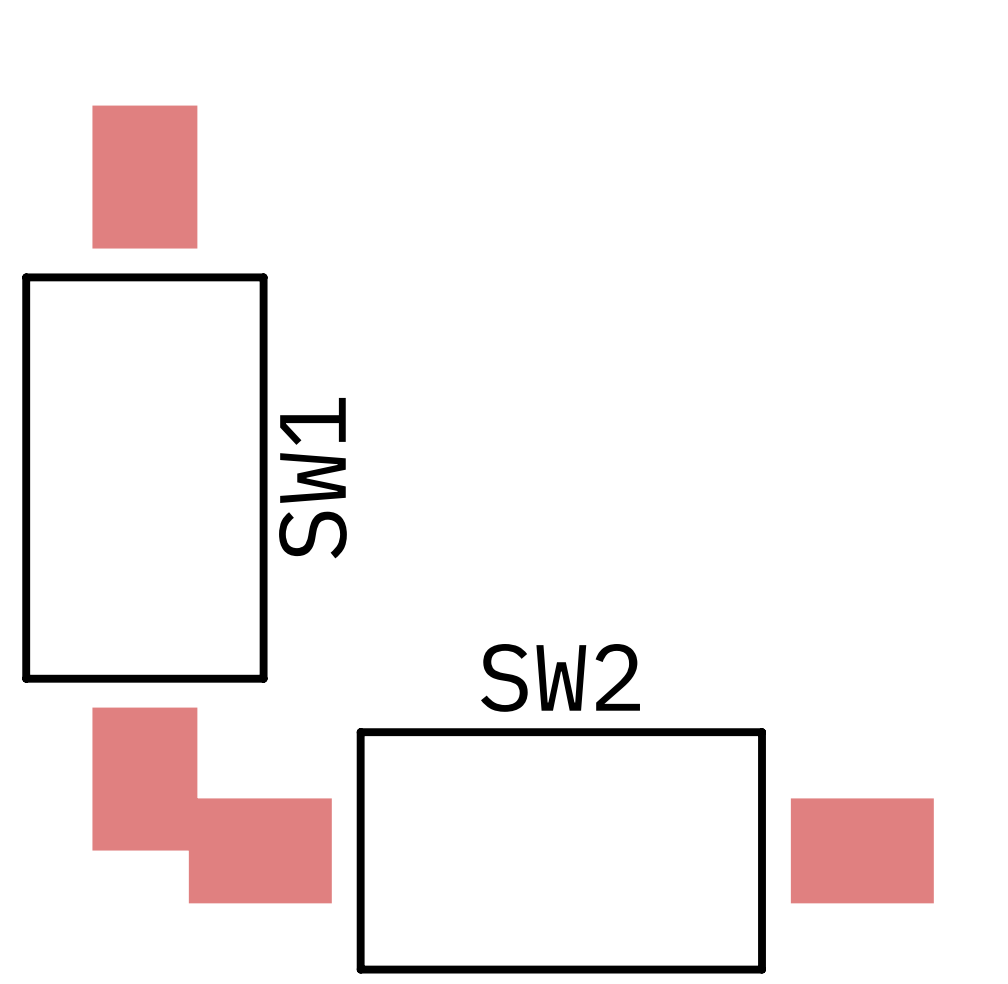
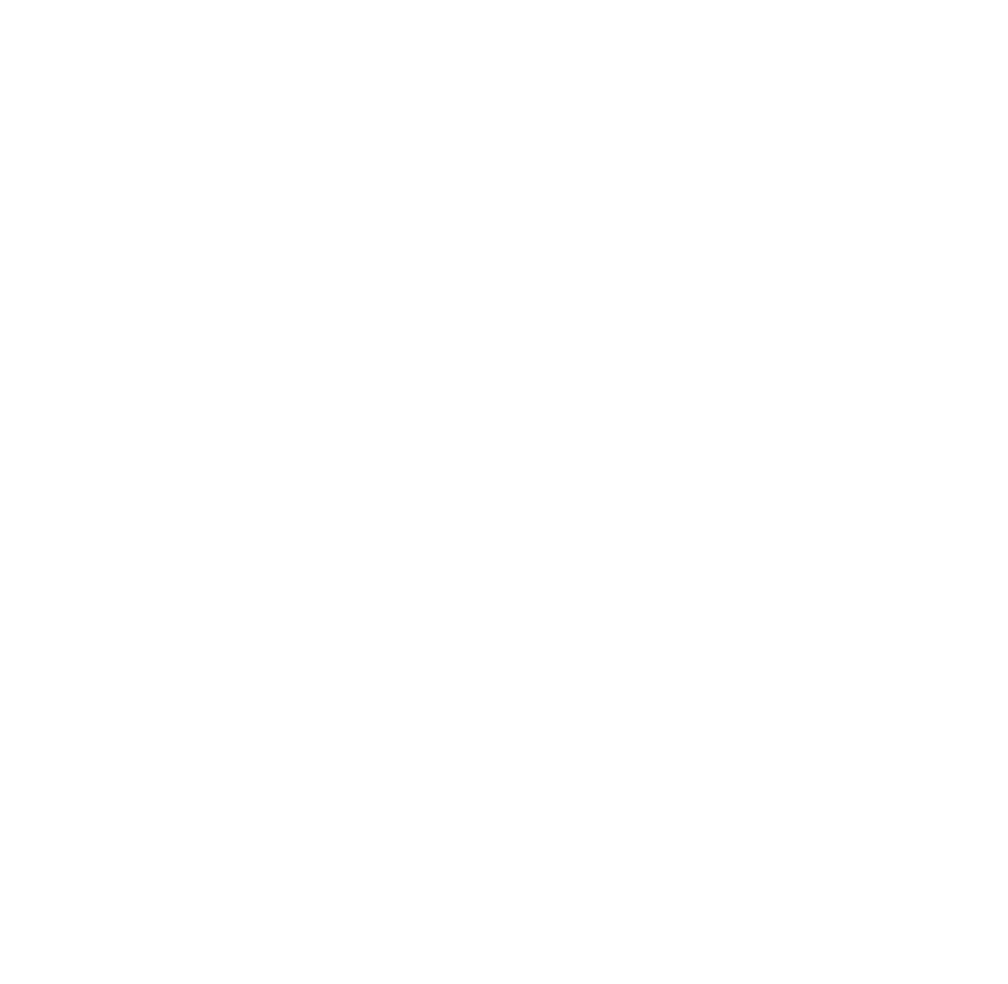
SW1: (144, 478) -> none
SW2: (561, 850) -> none

